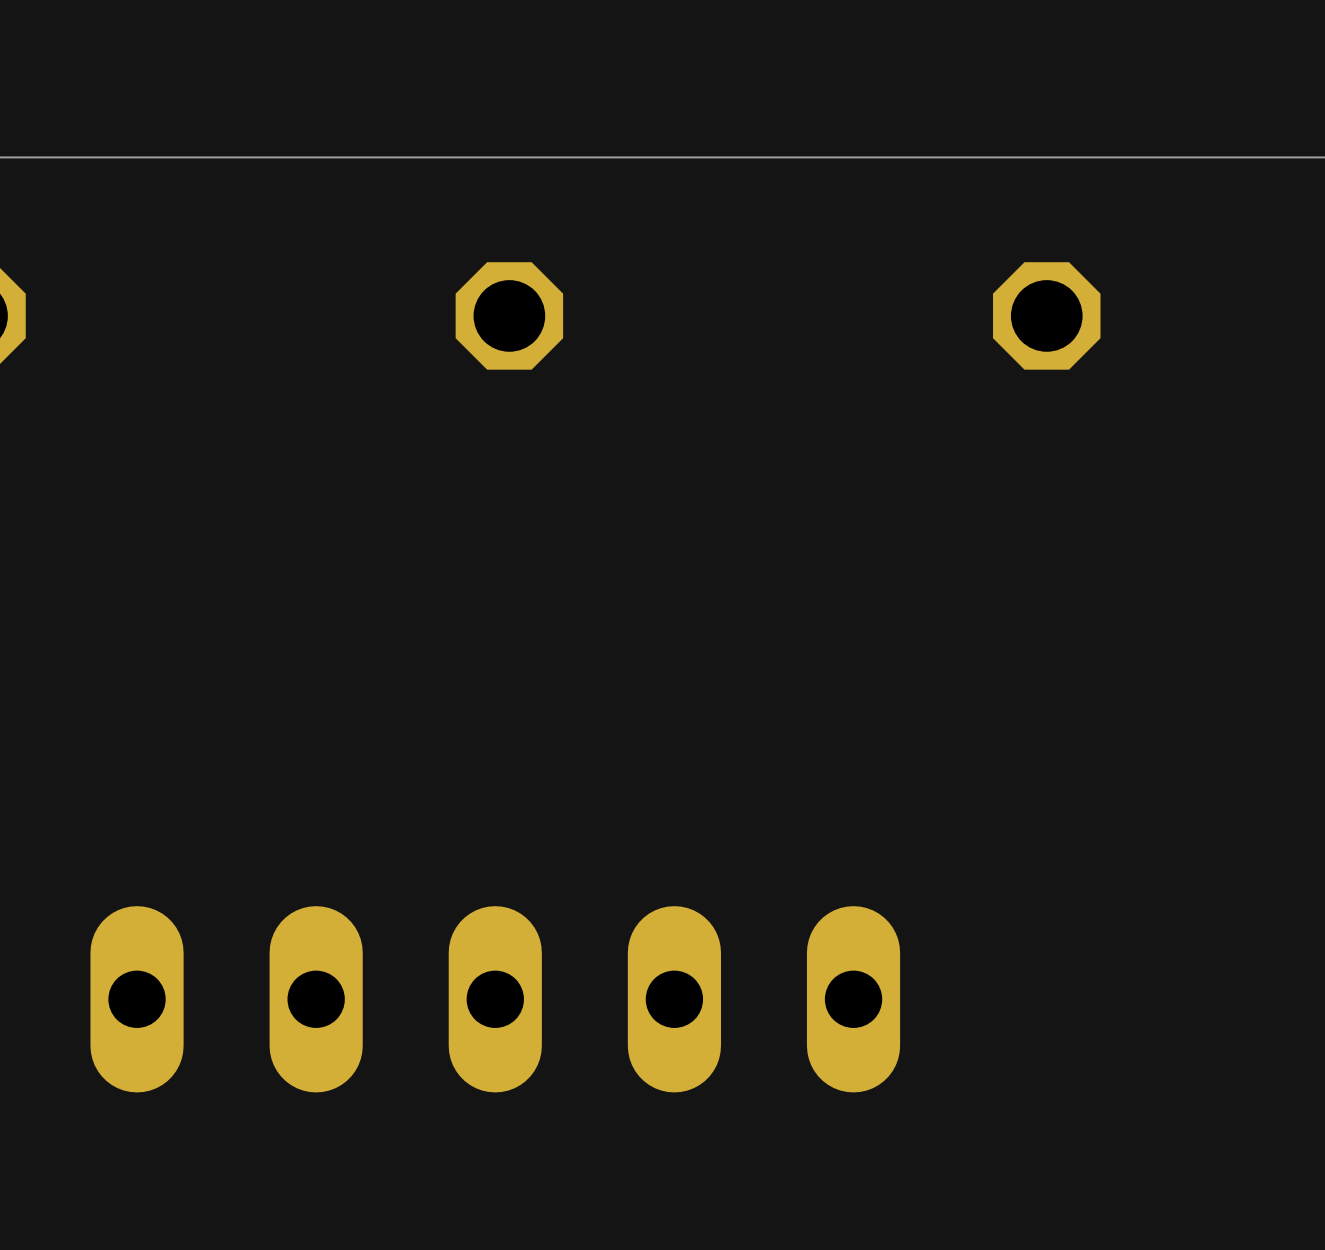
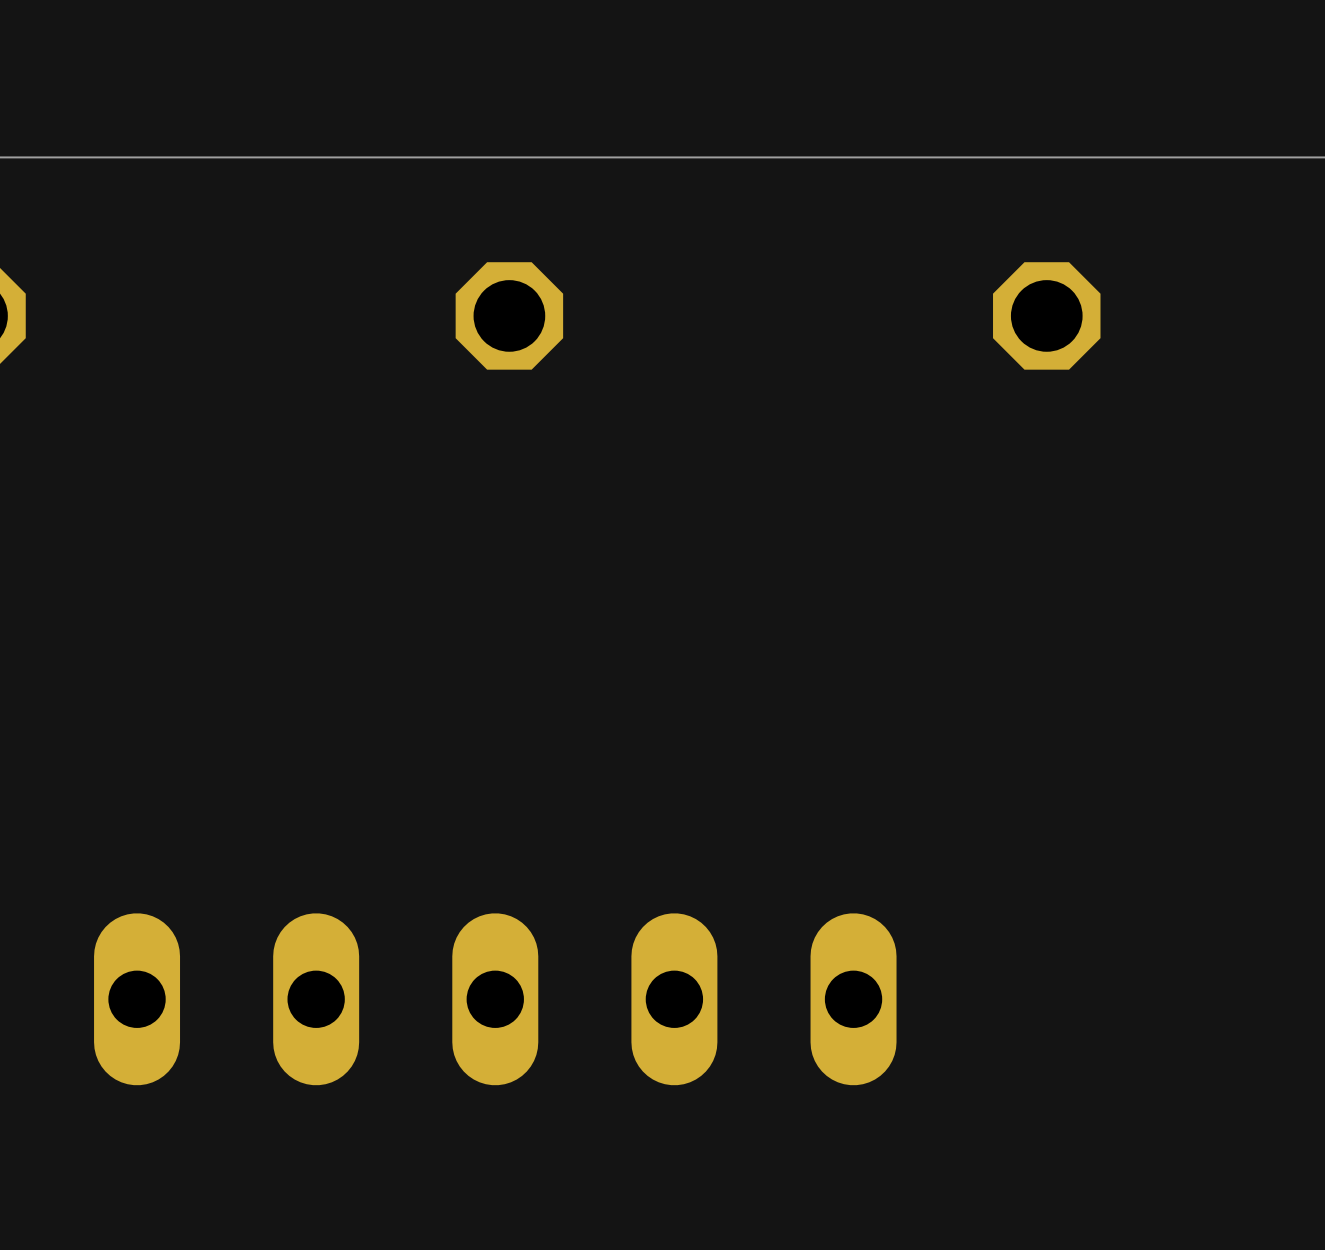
part footprint: [90, 906, 901, 1093] -> [94, 913, 897, 1086]

